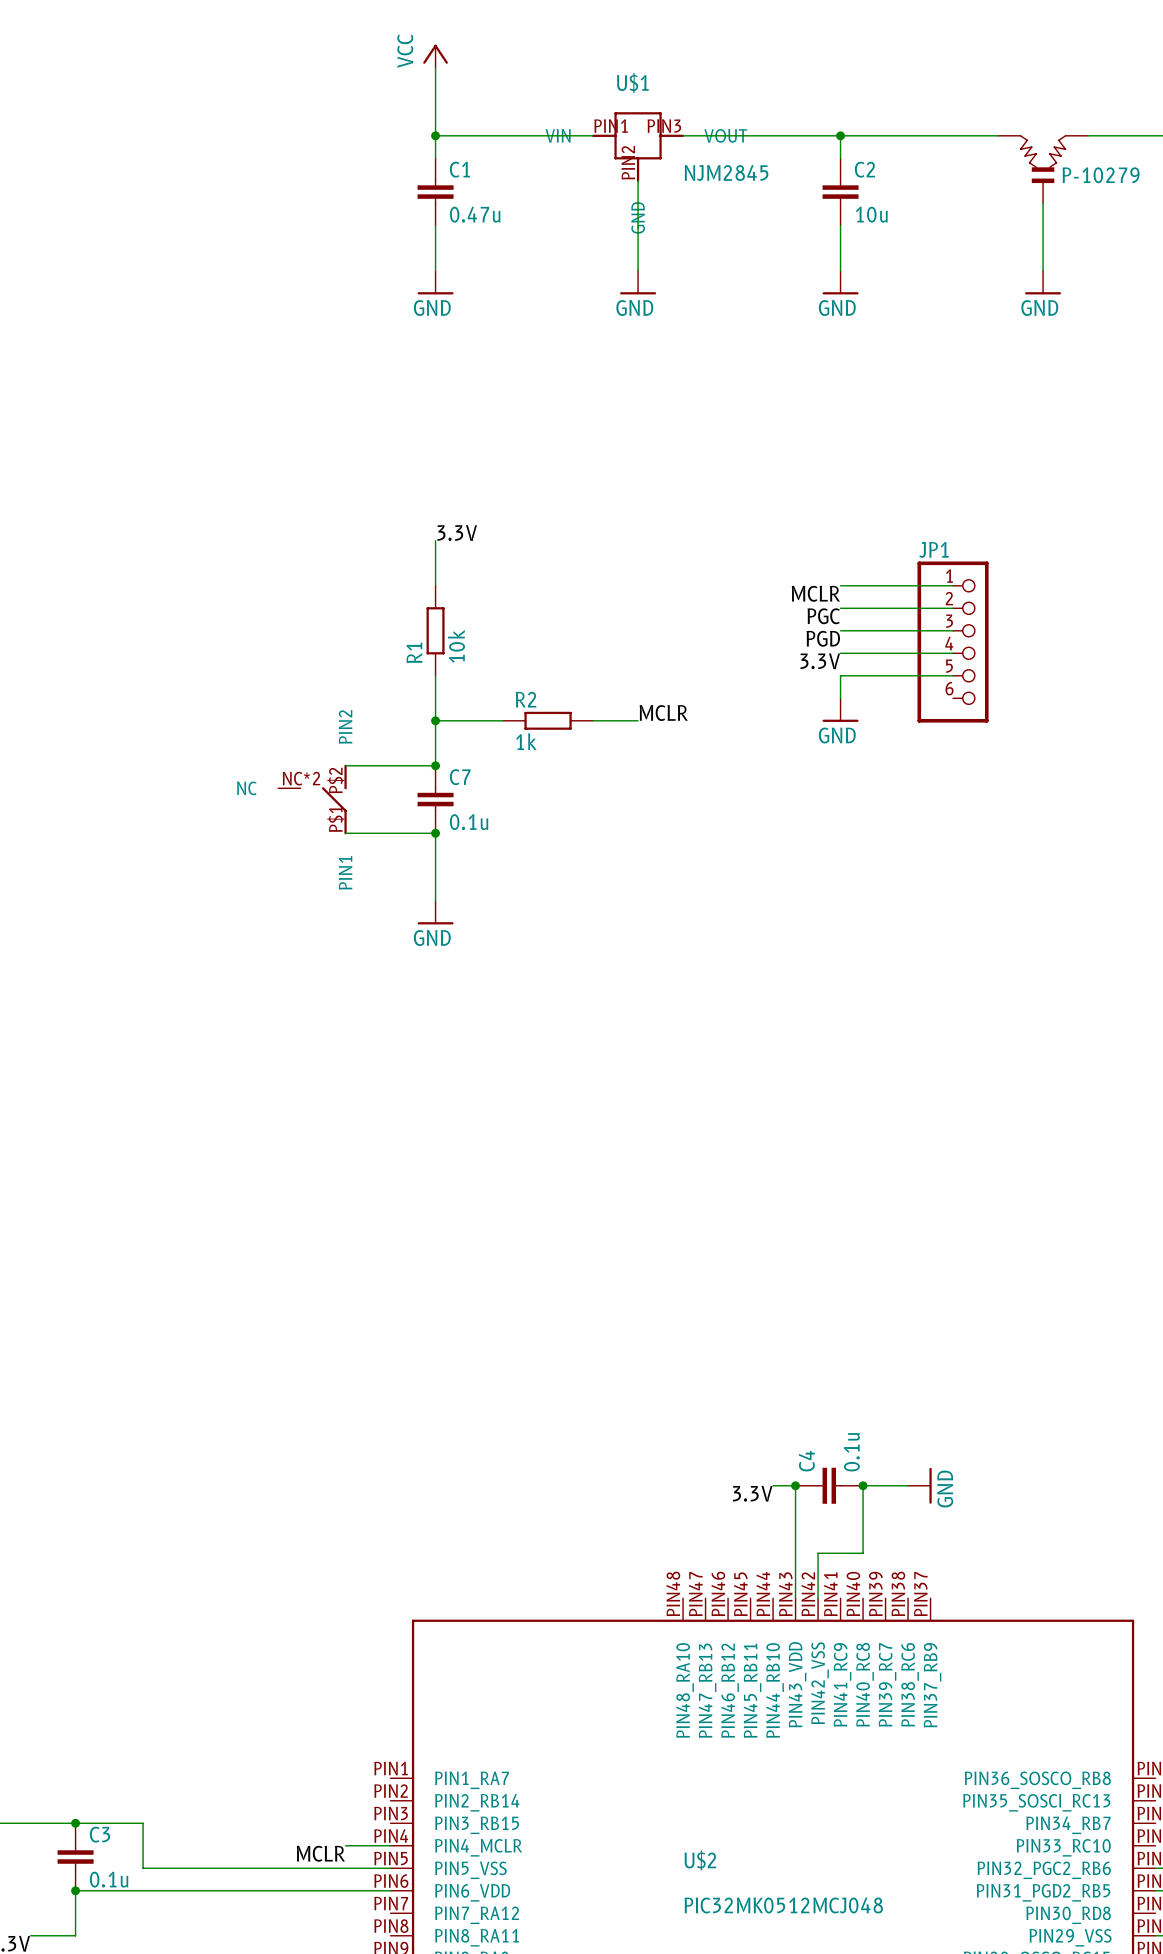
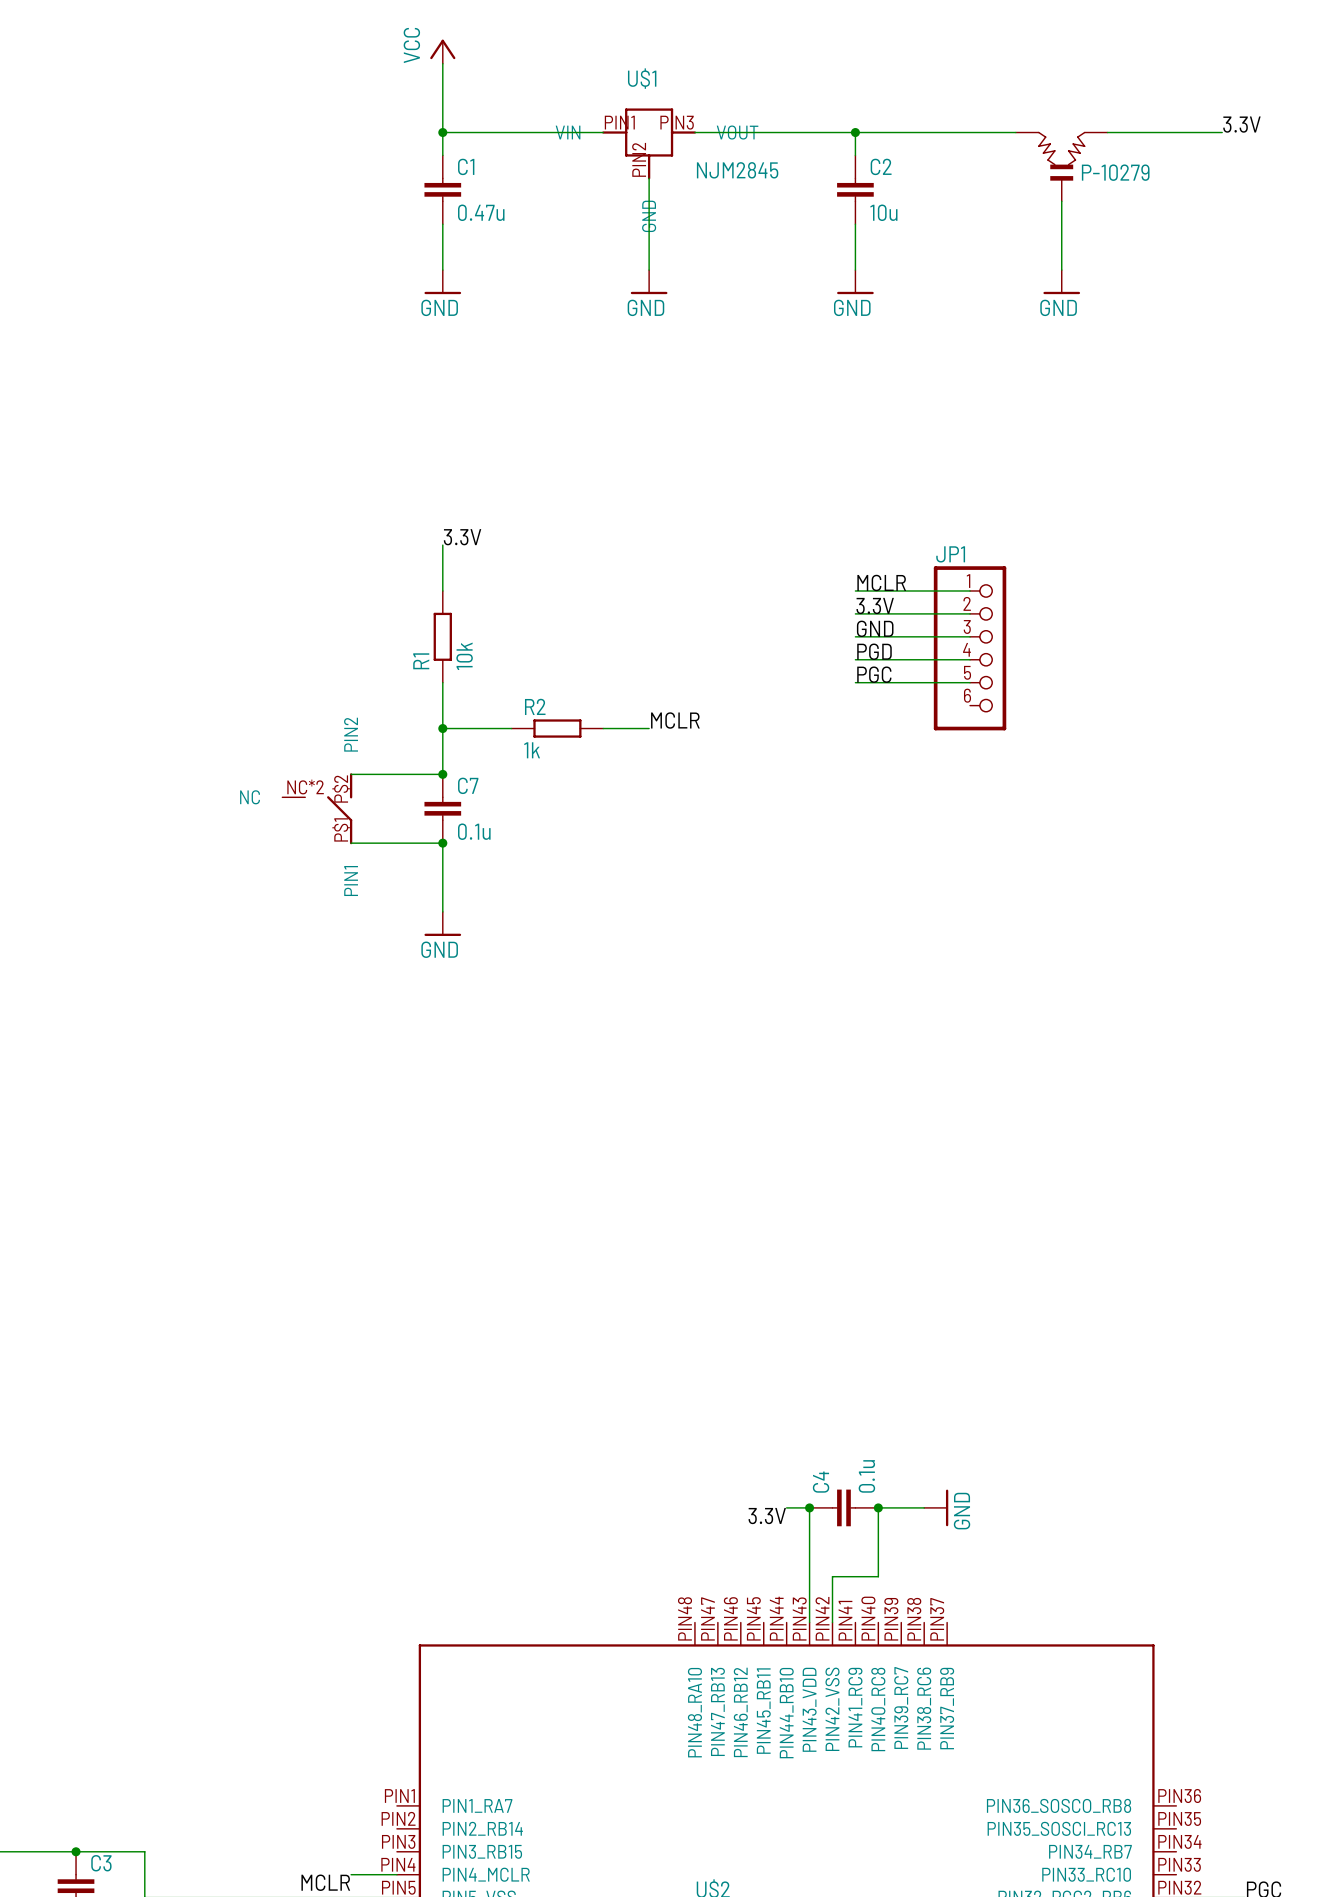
label position: MCLR (815, 593) -> MCLR (881, 582)
label: PGC (823, 616) -> 3.3V (875, 605)
label: PGD (823, 638) -> GND (875, 628)
label: 3.3V (820, 661) -> PGD (874, 651)
label: none -> PGC (874, 674)
wire: (840, 675) (840, 698) -> none
power symbol: GND (840, 710) -> none

